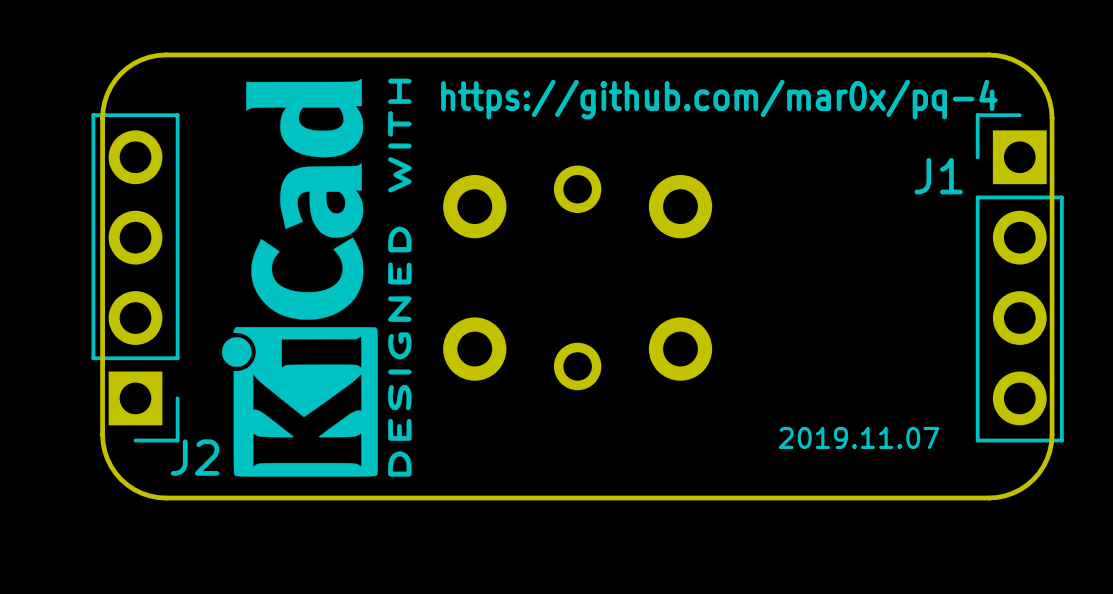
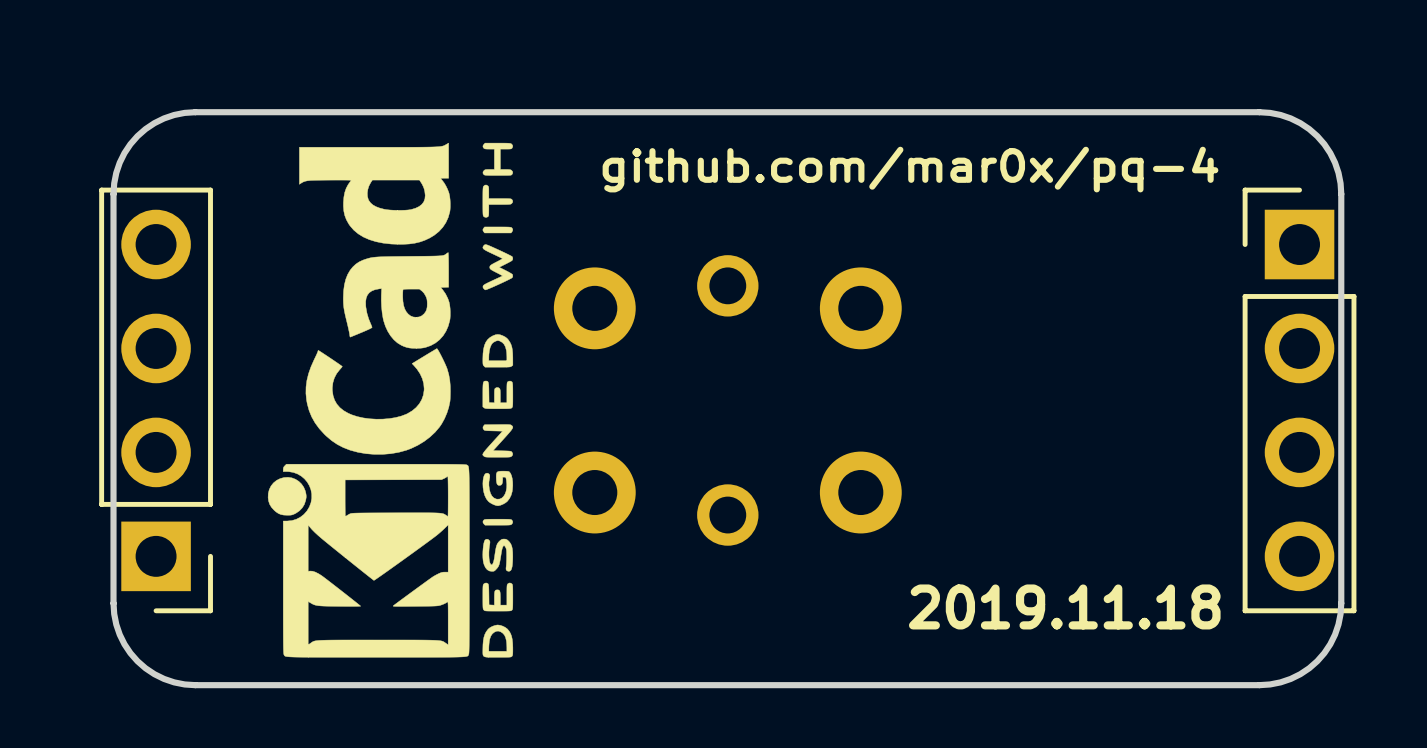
text: https://github.com/mar0x/pq-4 (719, 99) -> github.com/mar0x/pq-4 (910, 169)
J1 name: J1 (938, 176) -> none
text: 2019.11.07 (859, 437) -> 2019.11.18 (1064, 606)
J2 name: J2 (195, 457) -> none

